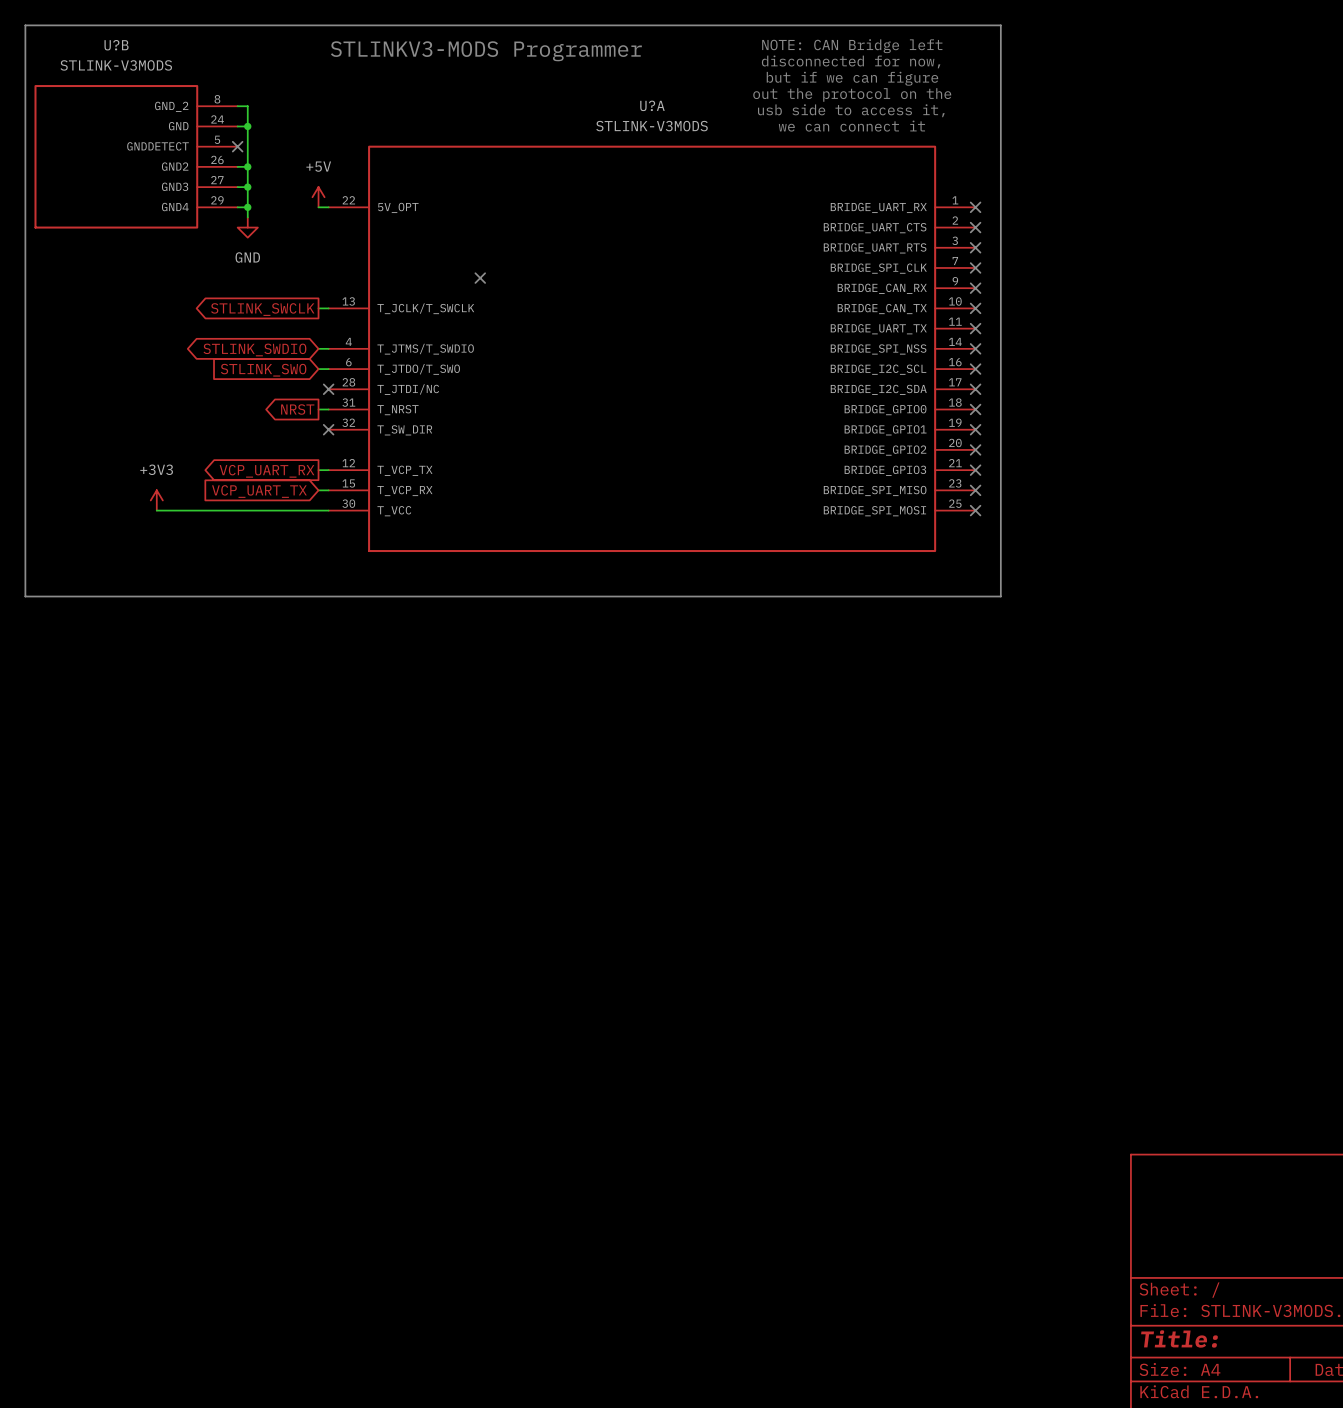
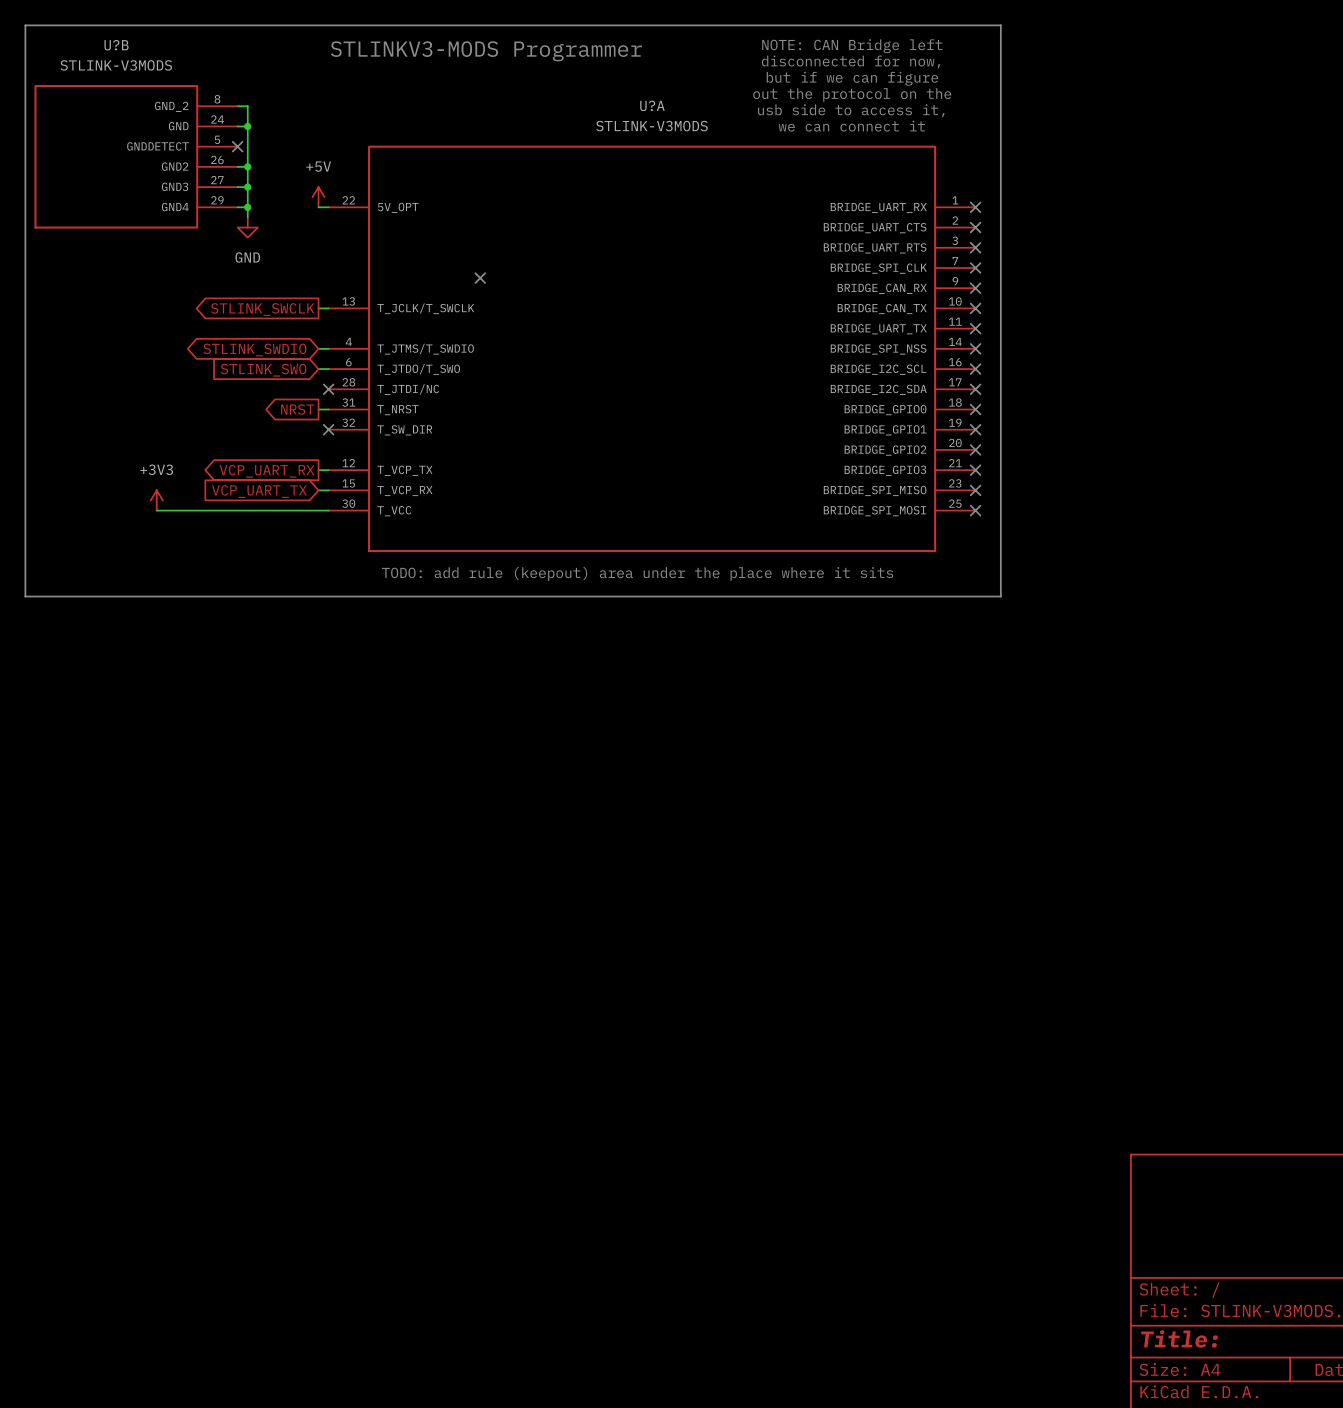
text: none -> TODO: add rule (keepout) area under the place where it sits (637, 573)

